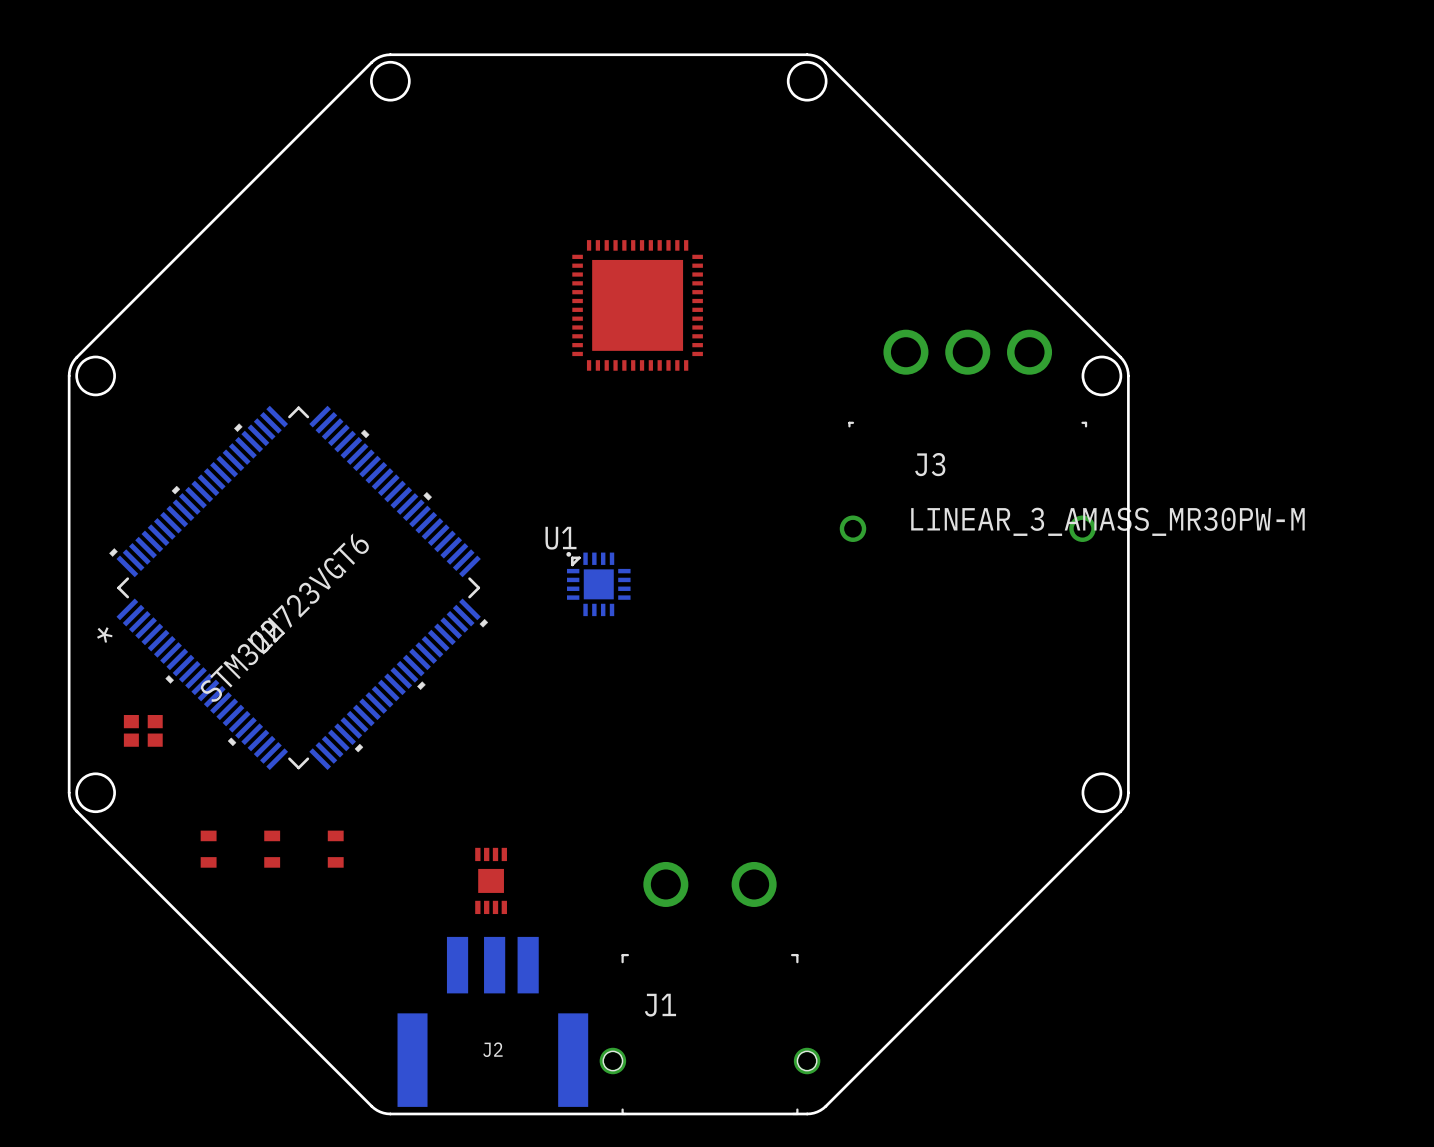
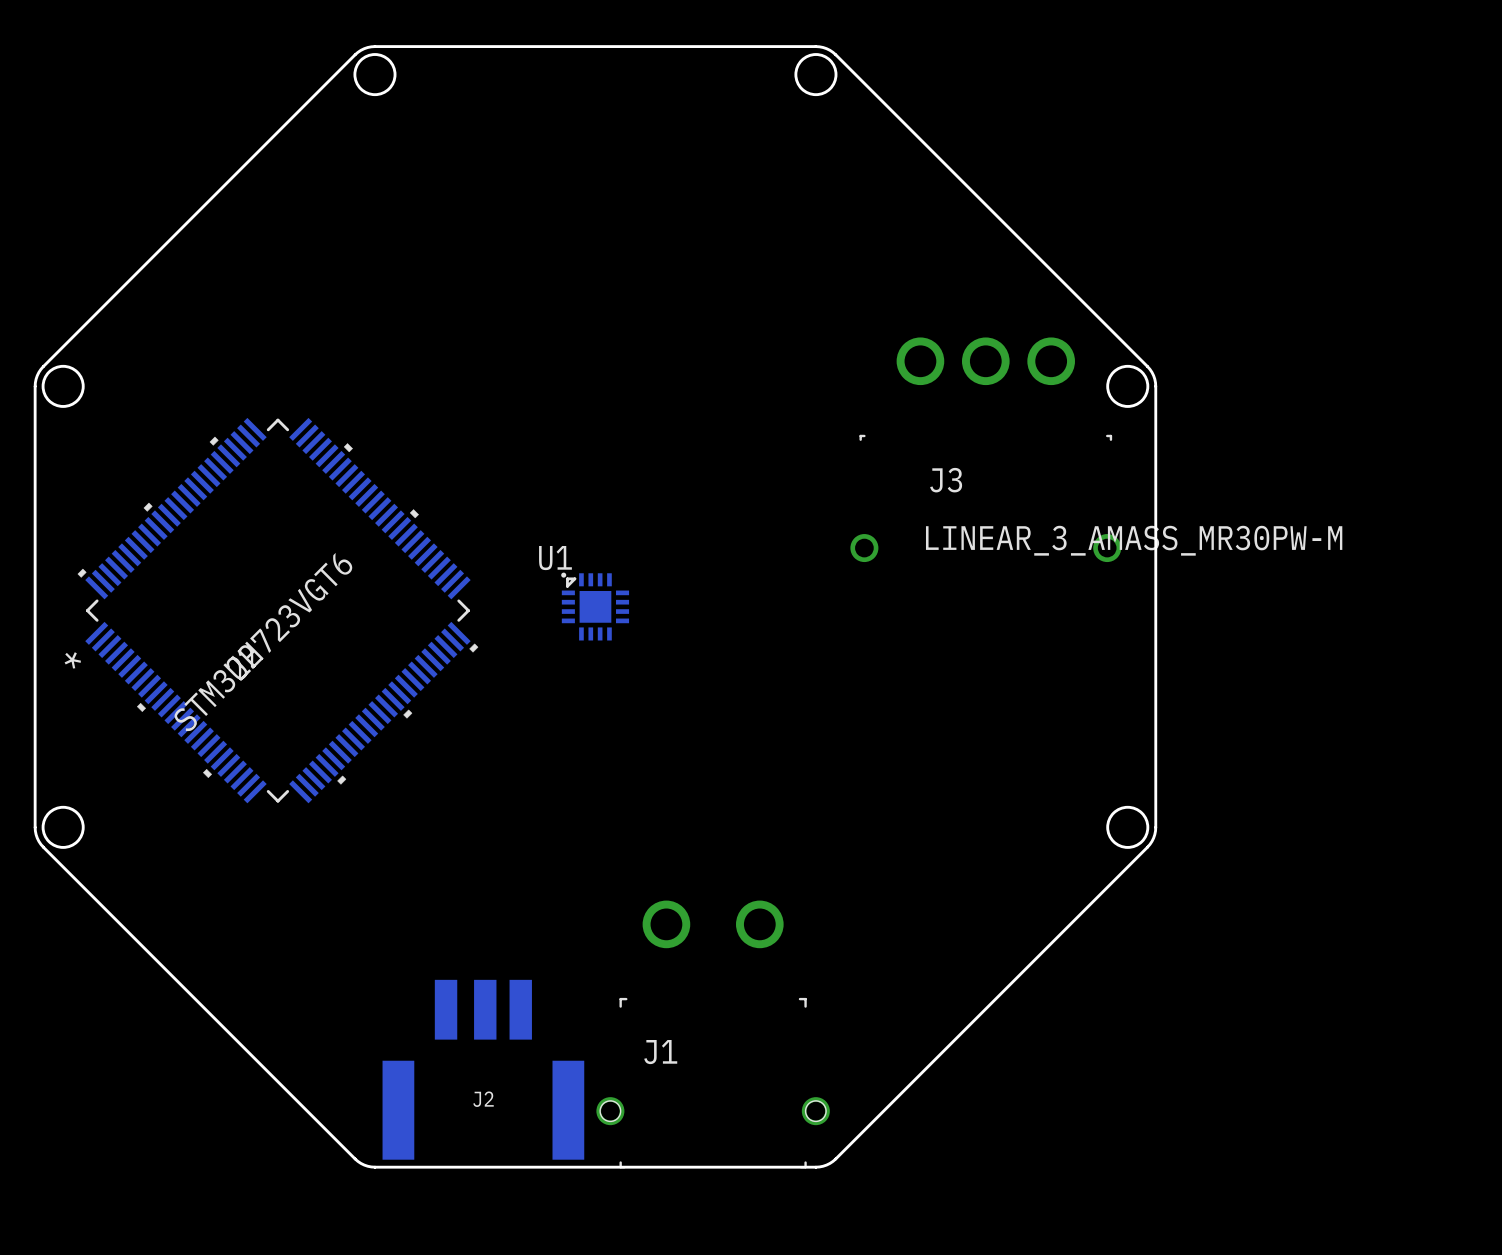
part: (637, 305) -> none
part: (143, 730) -> none
part: (208, 849) -> none
part: (272, 849) -> none
part: (335, 849) -> none
part: (491, 880) -> none

